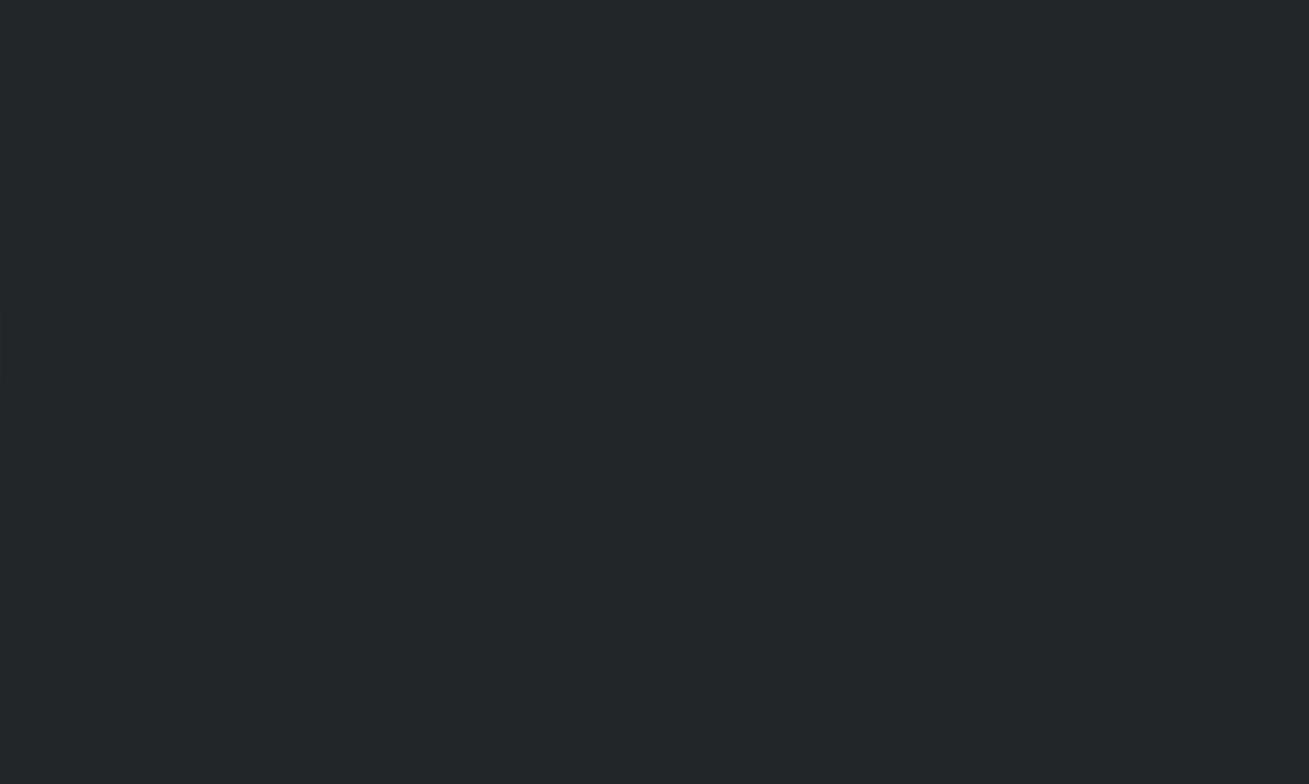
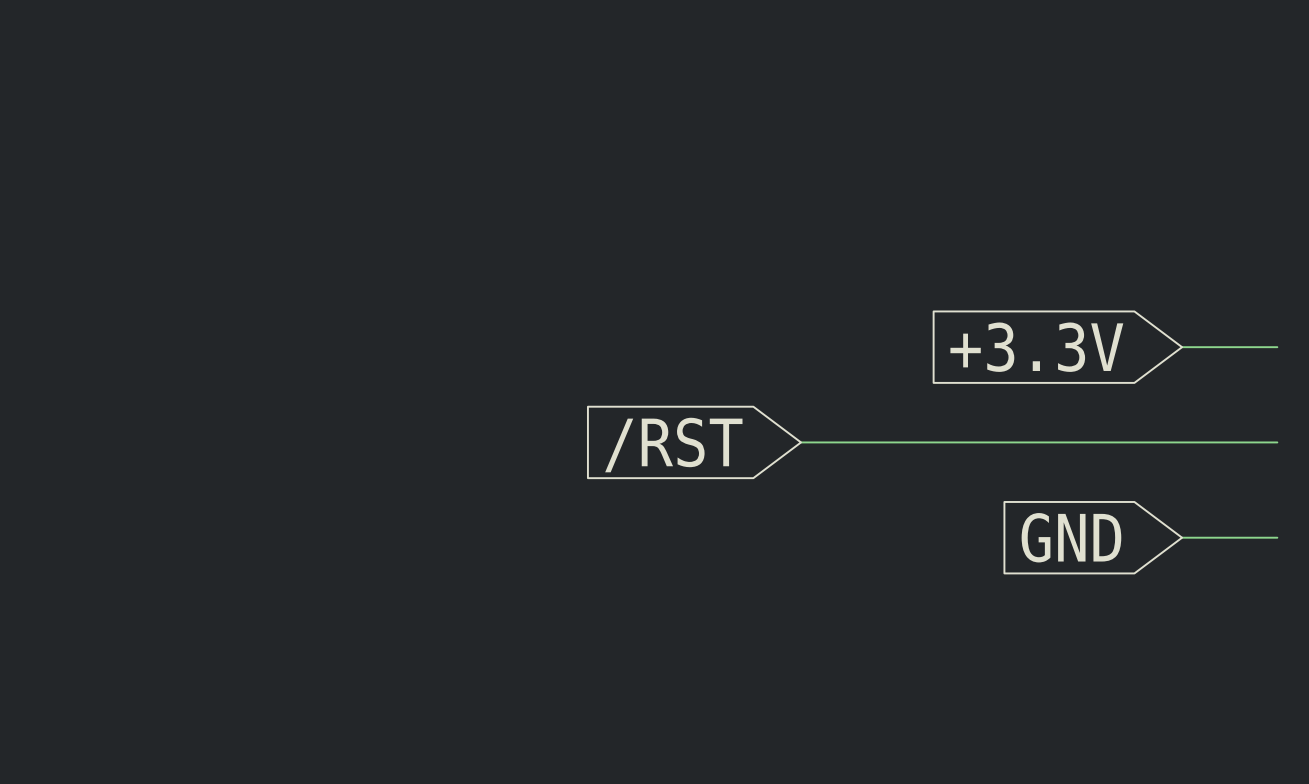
global label: none -> +3.3V (1036, 347)
wire: none -> (1182, 347) (1277, 347)
wire: none -> (801, 442) (1277, 442)
global label: none -> /RST (673, 445)
global label: none -> GND (1071, 537)
wire: none -> (1182, 537) (1277, 537)

